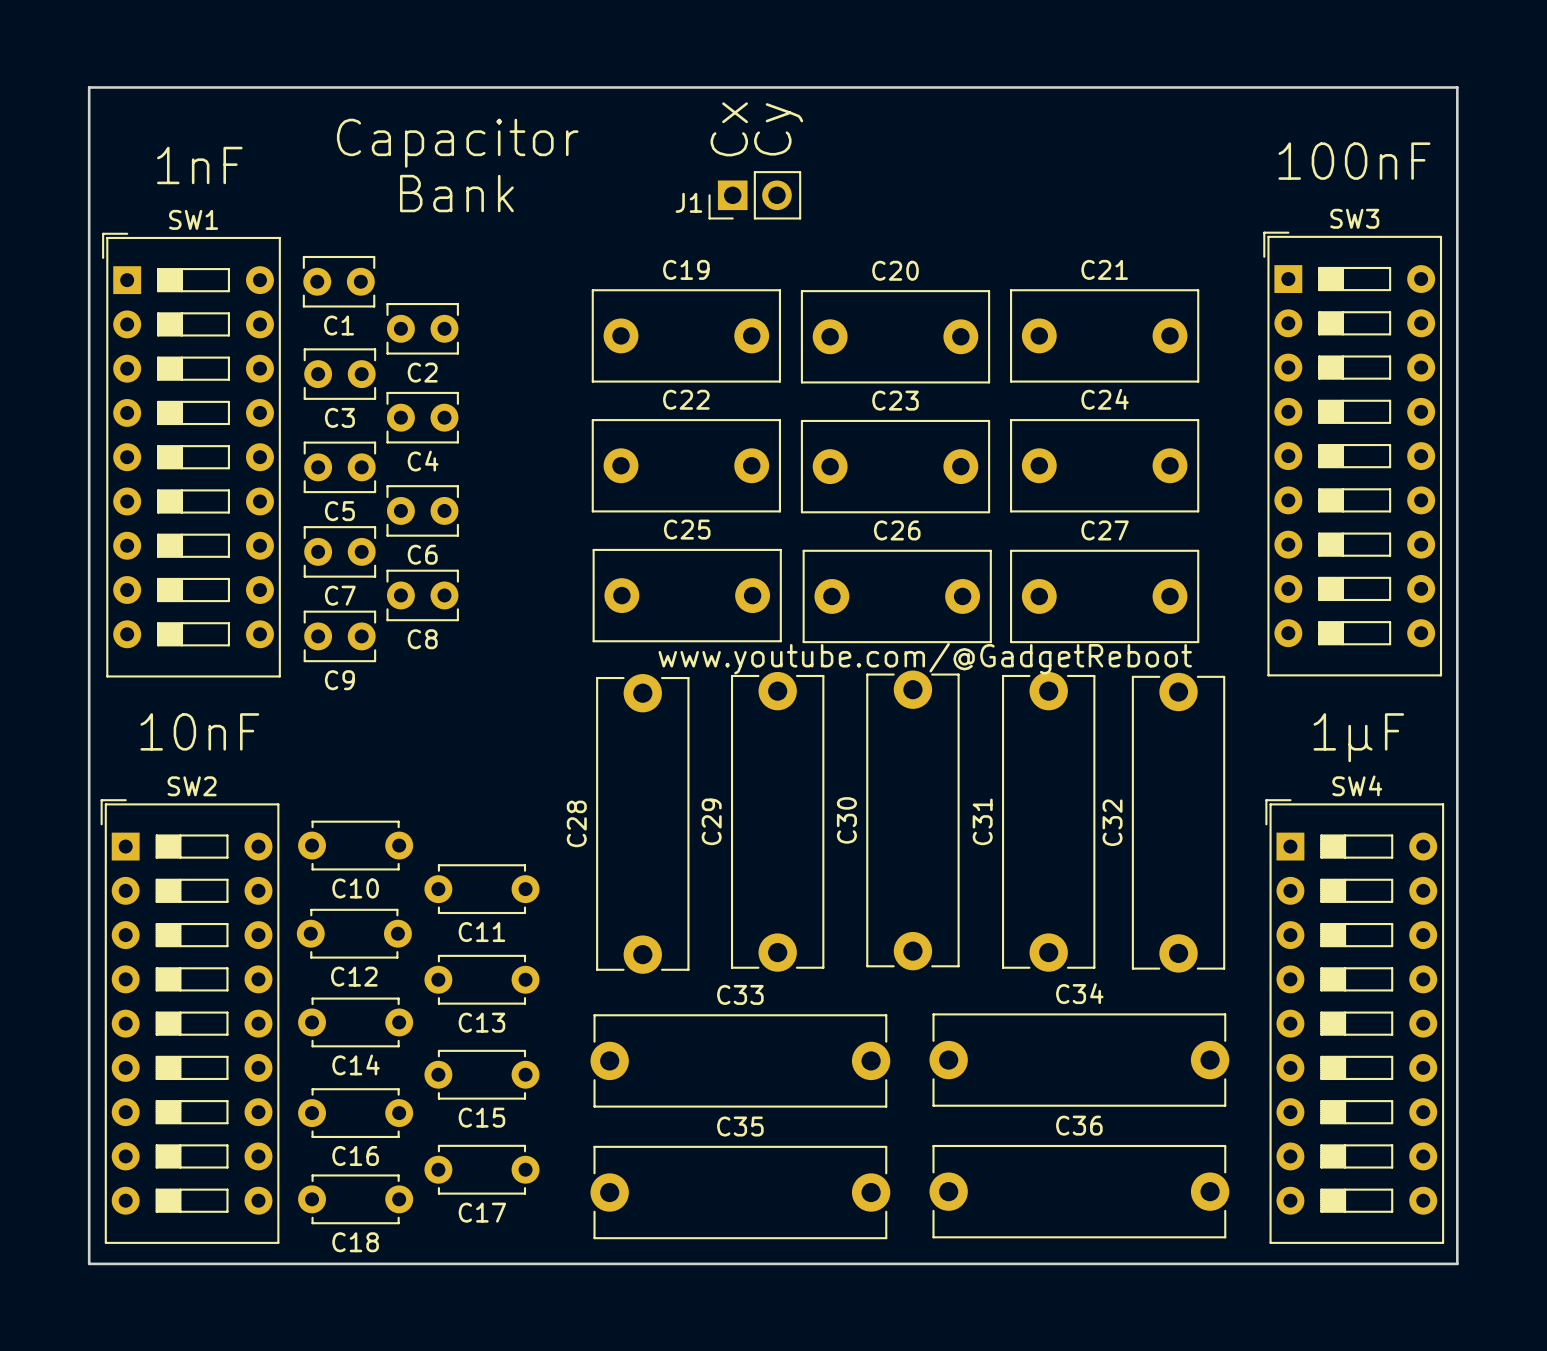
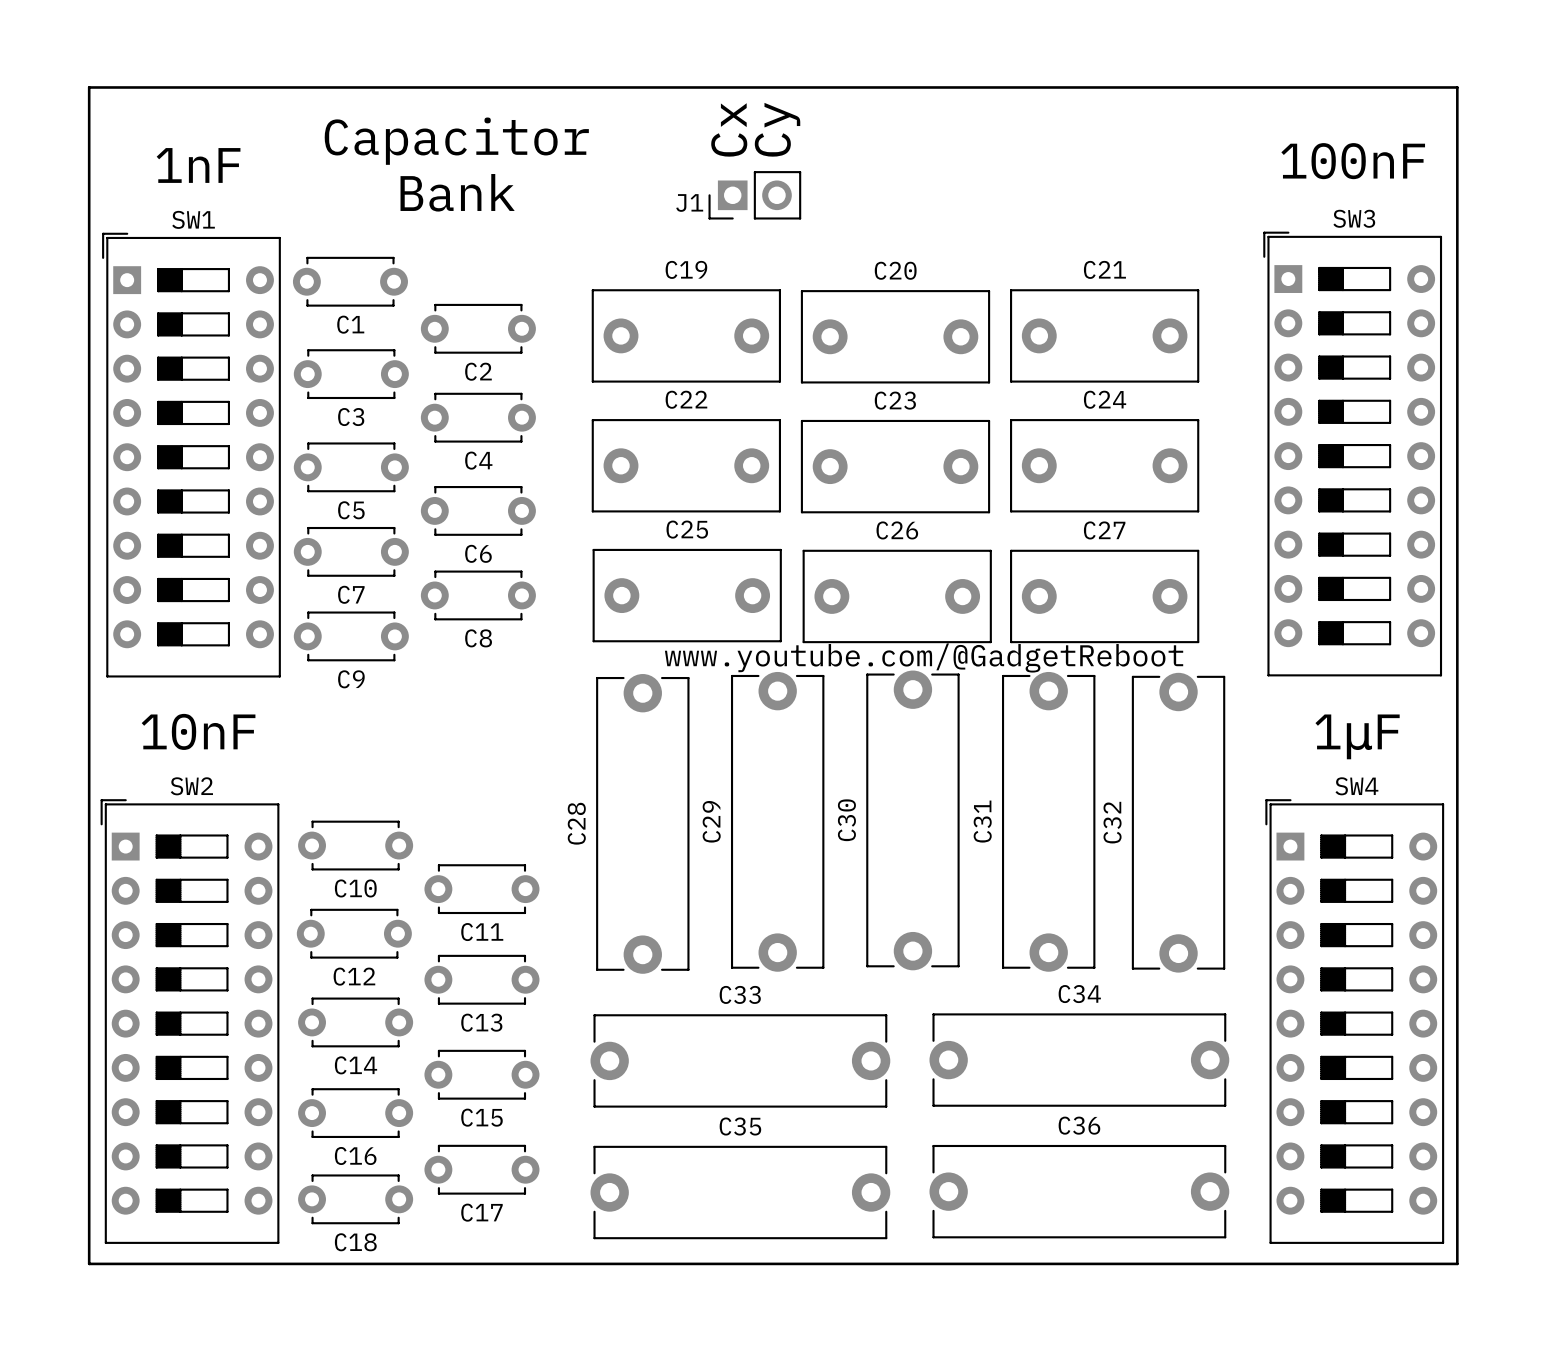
C1 footprint: [302, 255, 376, 308] -> [292, 256, 408, 307]
C2 footprint: [386, 303, 459, 355] -> [420, 303, 536, 354]
C3 footprint: [303, 348, 377, 400] -> [293, 349, 409, 400]
C4 footprint: [386, 391, 459, 444] -> [420, 392, 536, 443]
C5 footprint: [303, 441, 377, 494] -> [293, 442, 409, 493]
C6 footprint: [386, 485, 459, 537] -> [420, 486, 536, 536]
C7 footprint: [303, 526, 377, 578] -> [293, 526, 409, 577]
C8 footprint: [386, 569, 459, 622] -> [420, 570, 536, 621]
C9 footprint: [303, 610, 377, 663] -> [293, 611, 409, 662]

